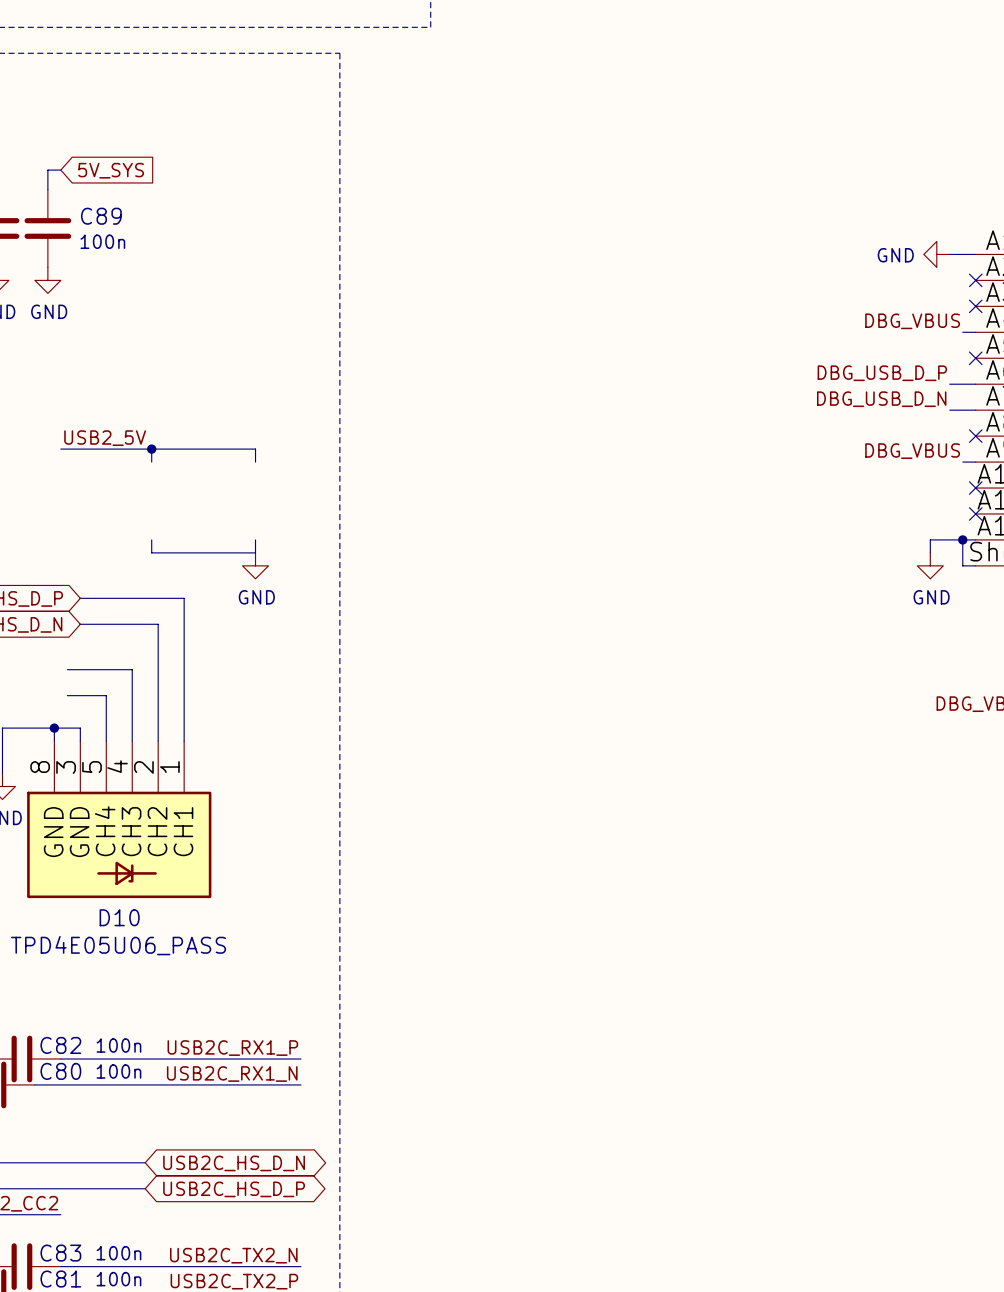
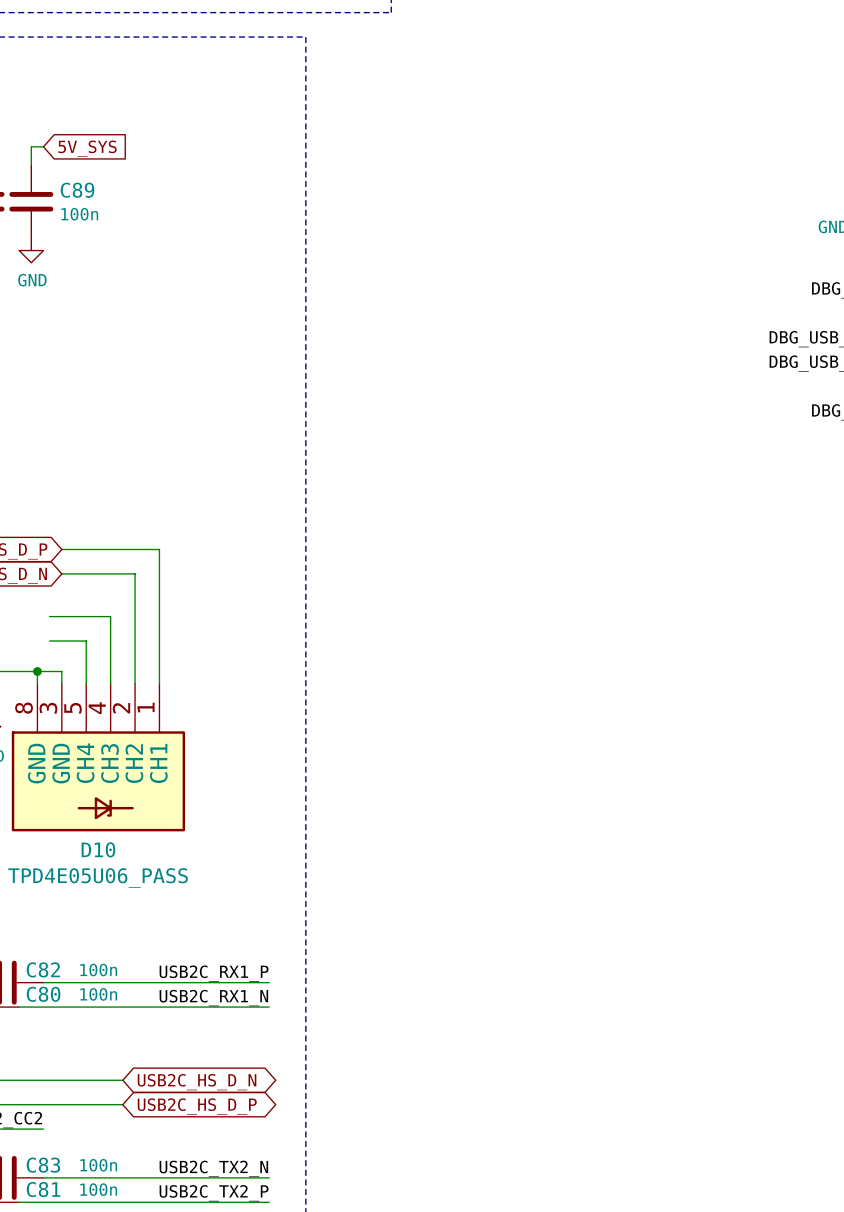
label: USB2_5V (105, 438) -> none
wire: (60, 449) (255, 449) (255, 462) -> none
wire: (151, 449) (151, 462) -> none
junction: (151, 449) -> none
wire: (151, 539) (151, 552) (255, 552) (255, 539) -> none
power symbol: GND (255, 565) -> none

